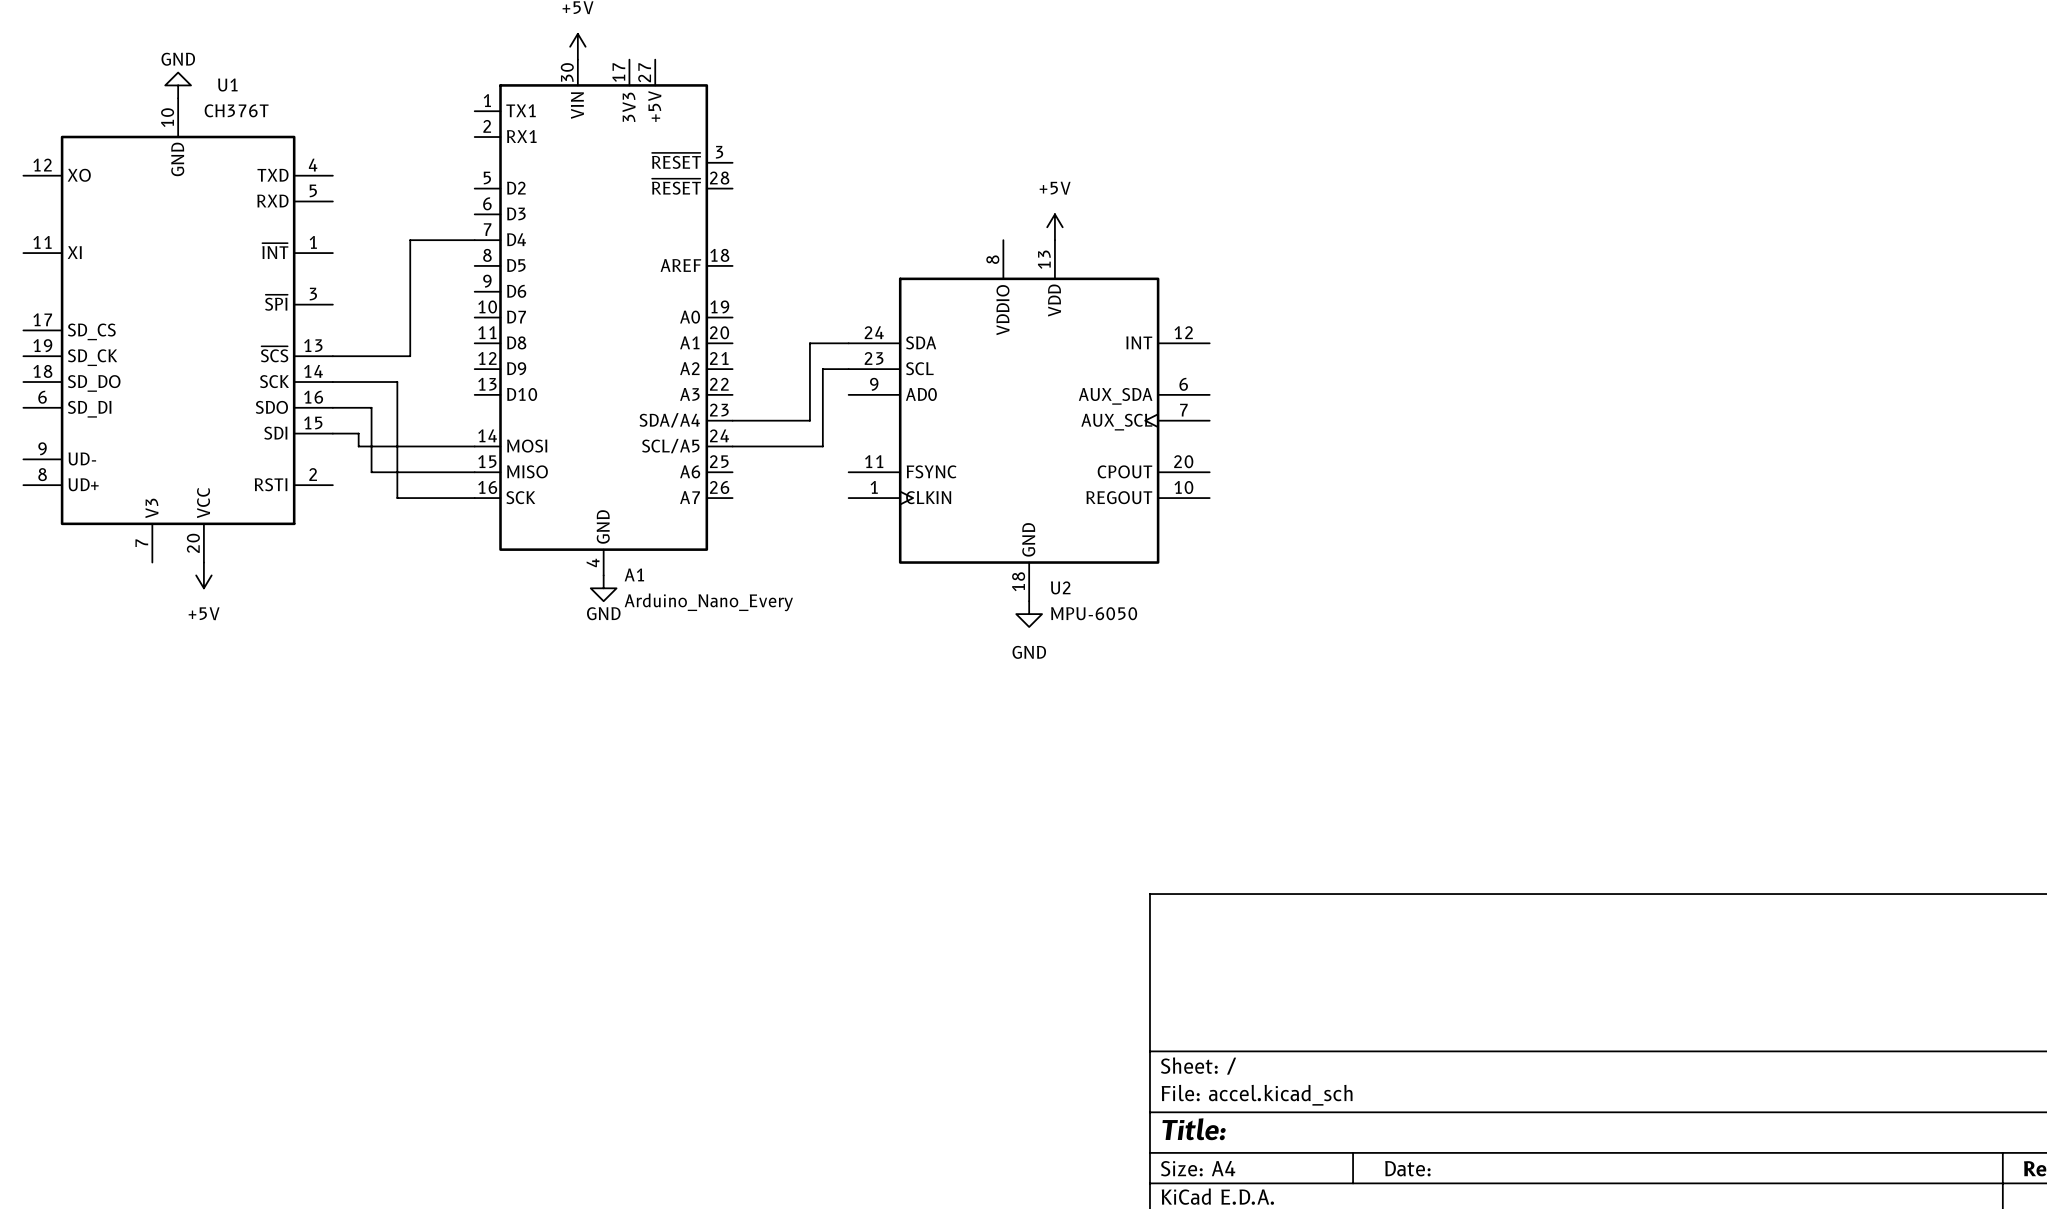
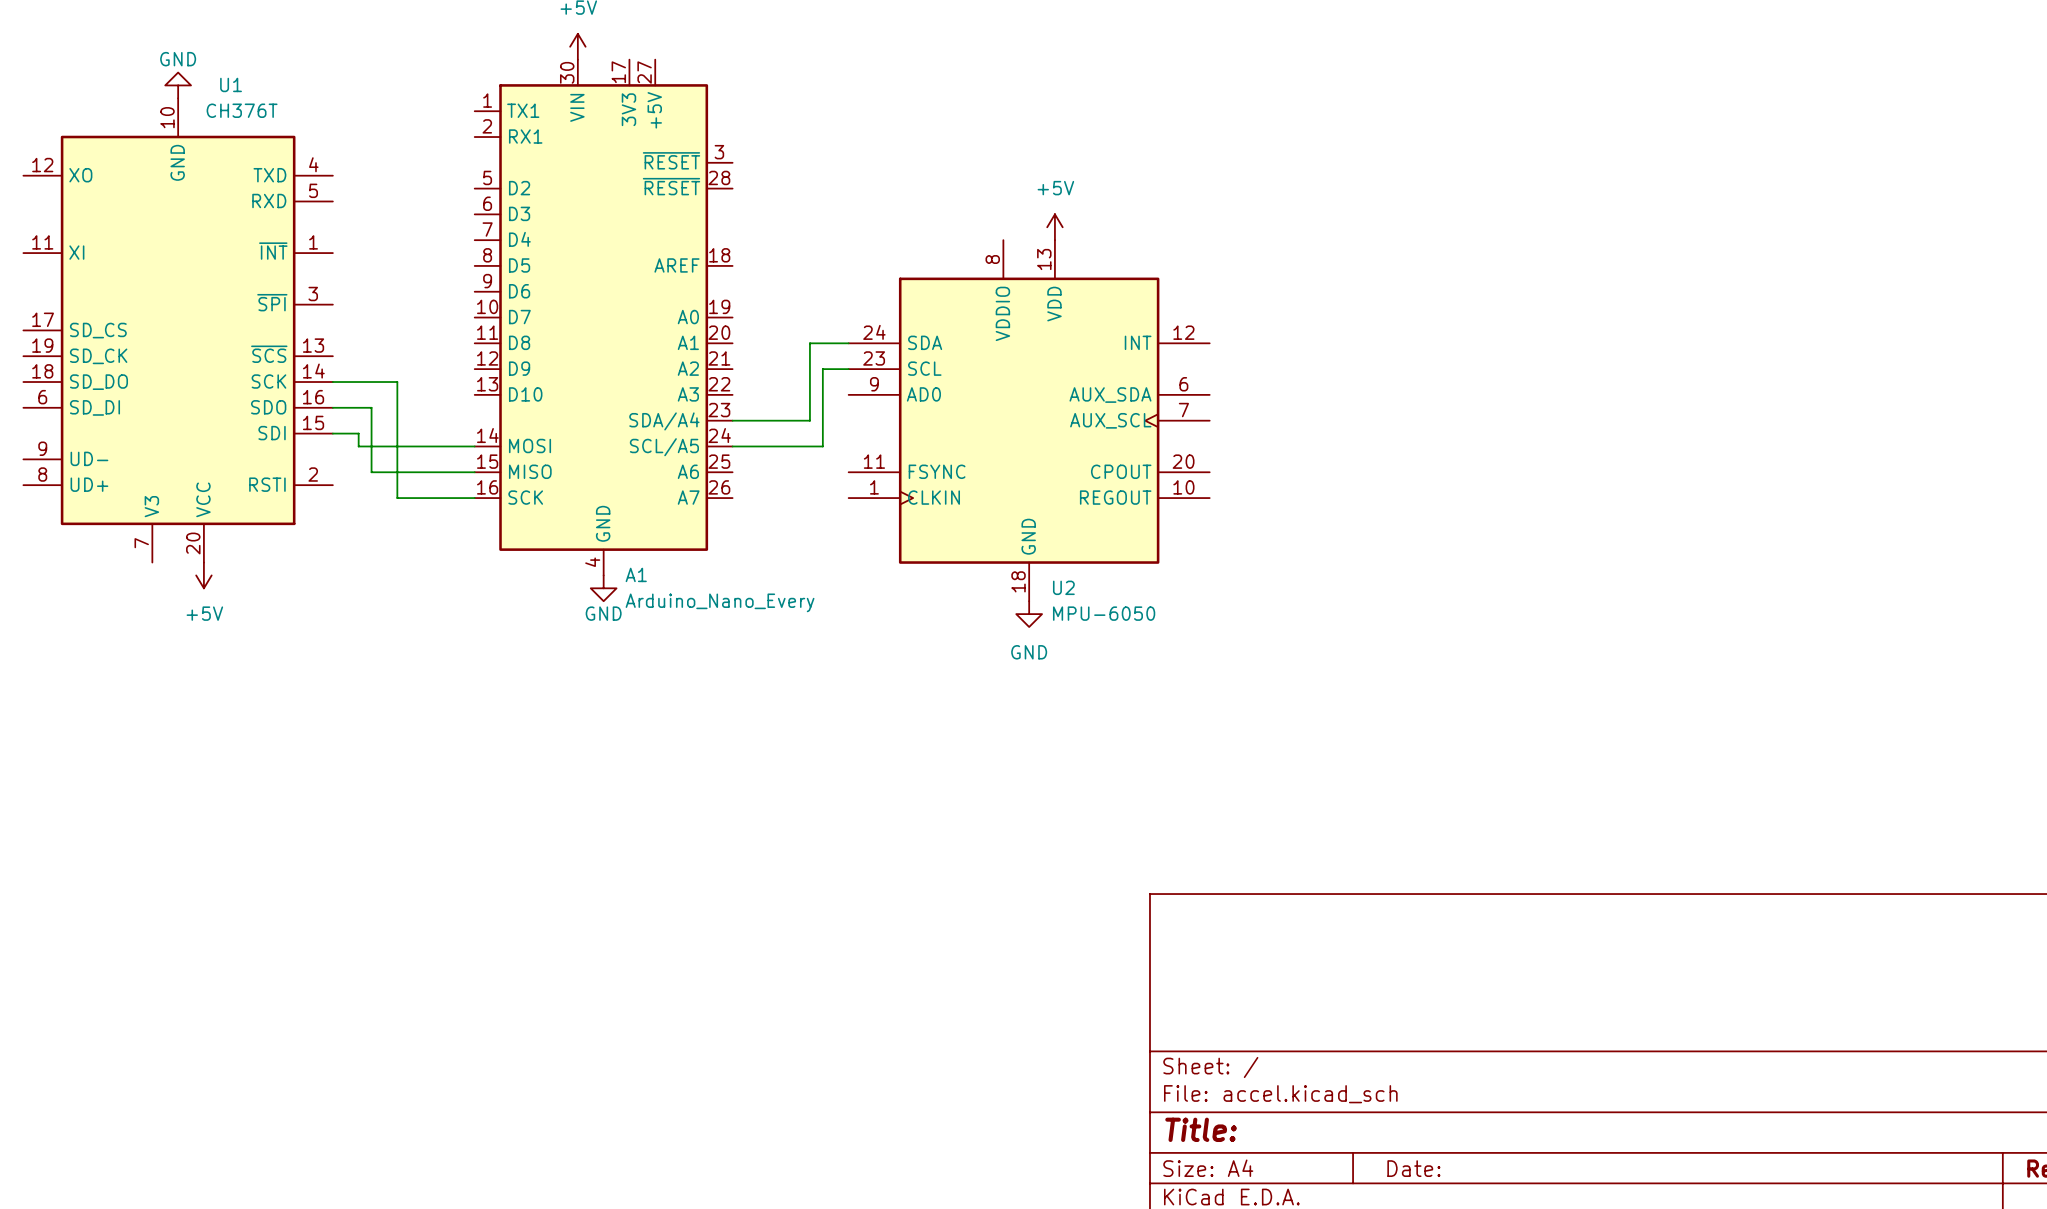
wire: (474, 240) (410, 240) (410, 356) (332, 356) -> none

